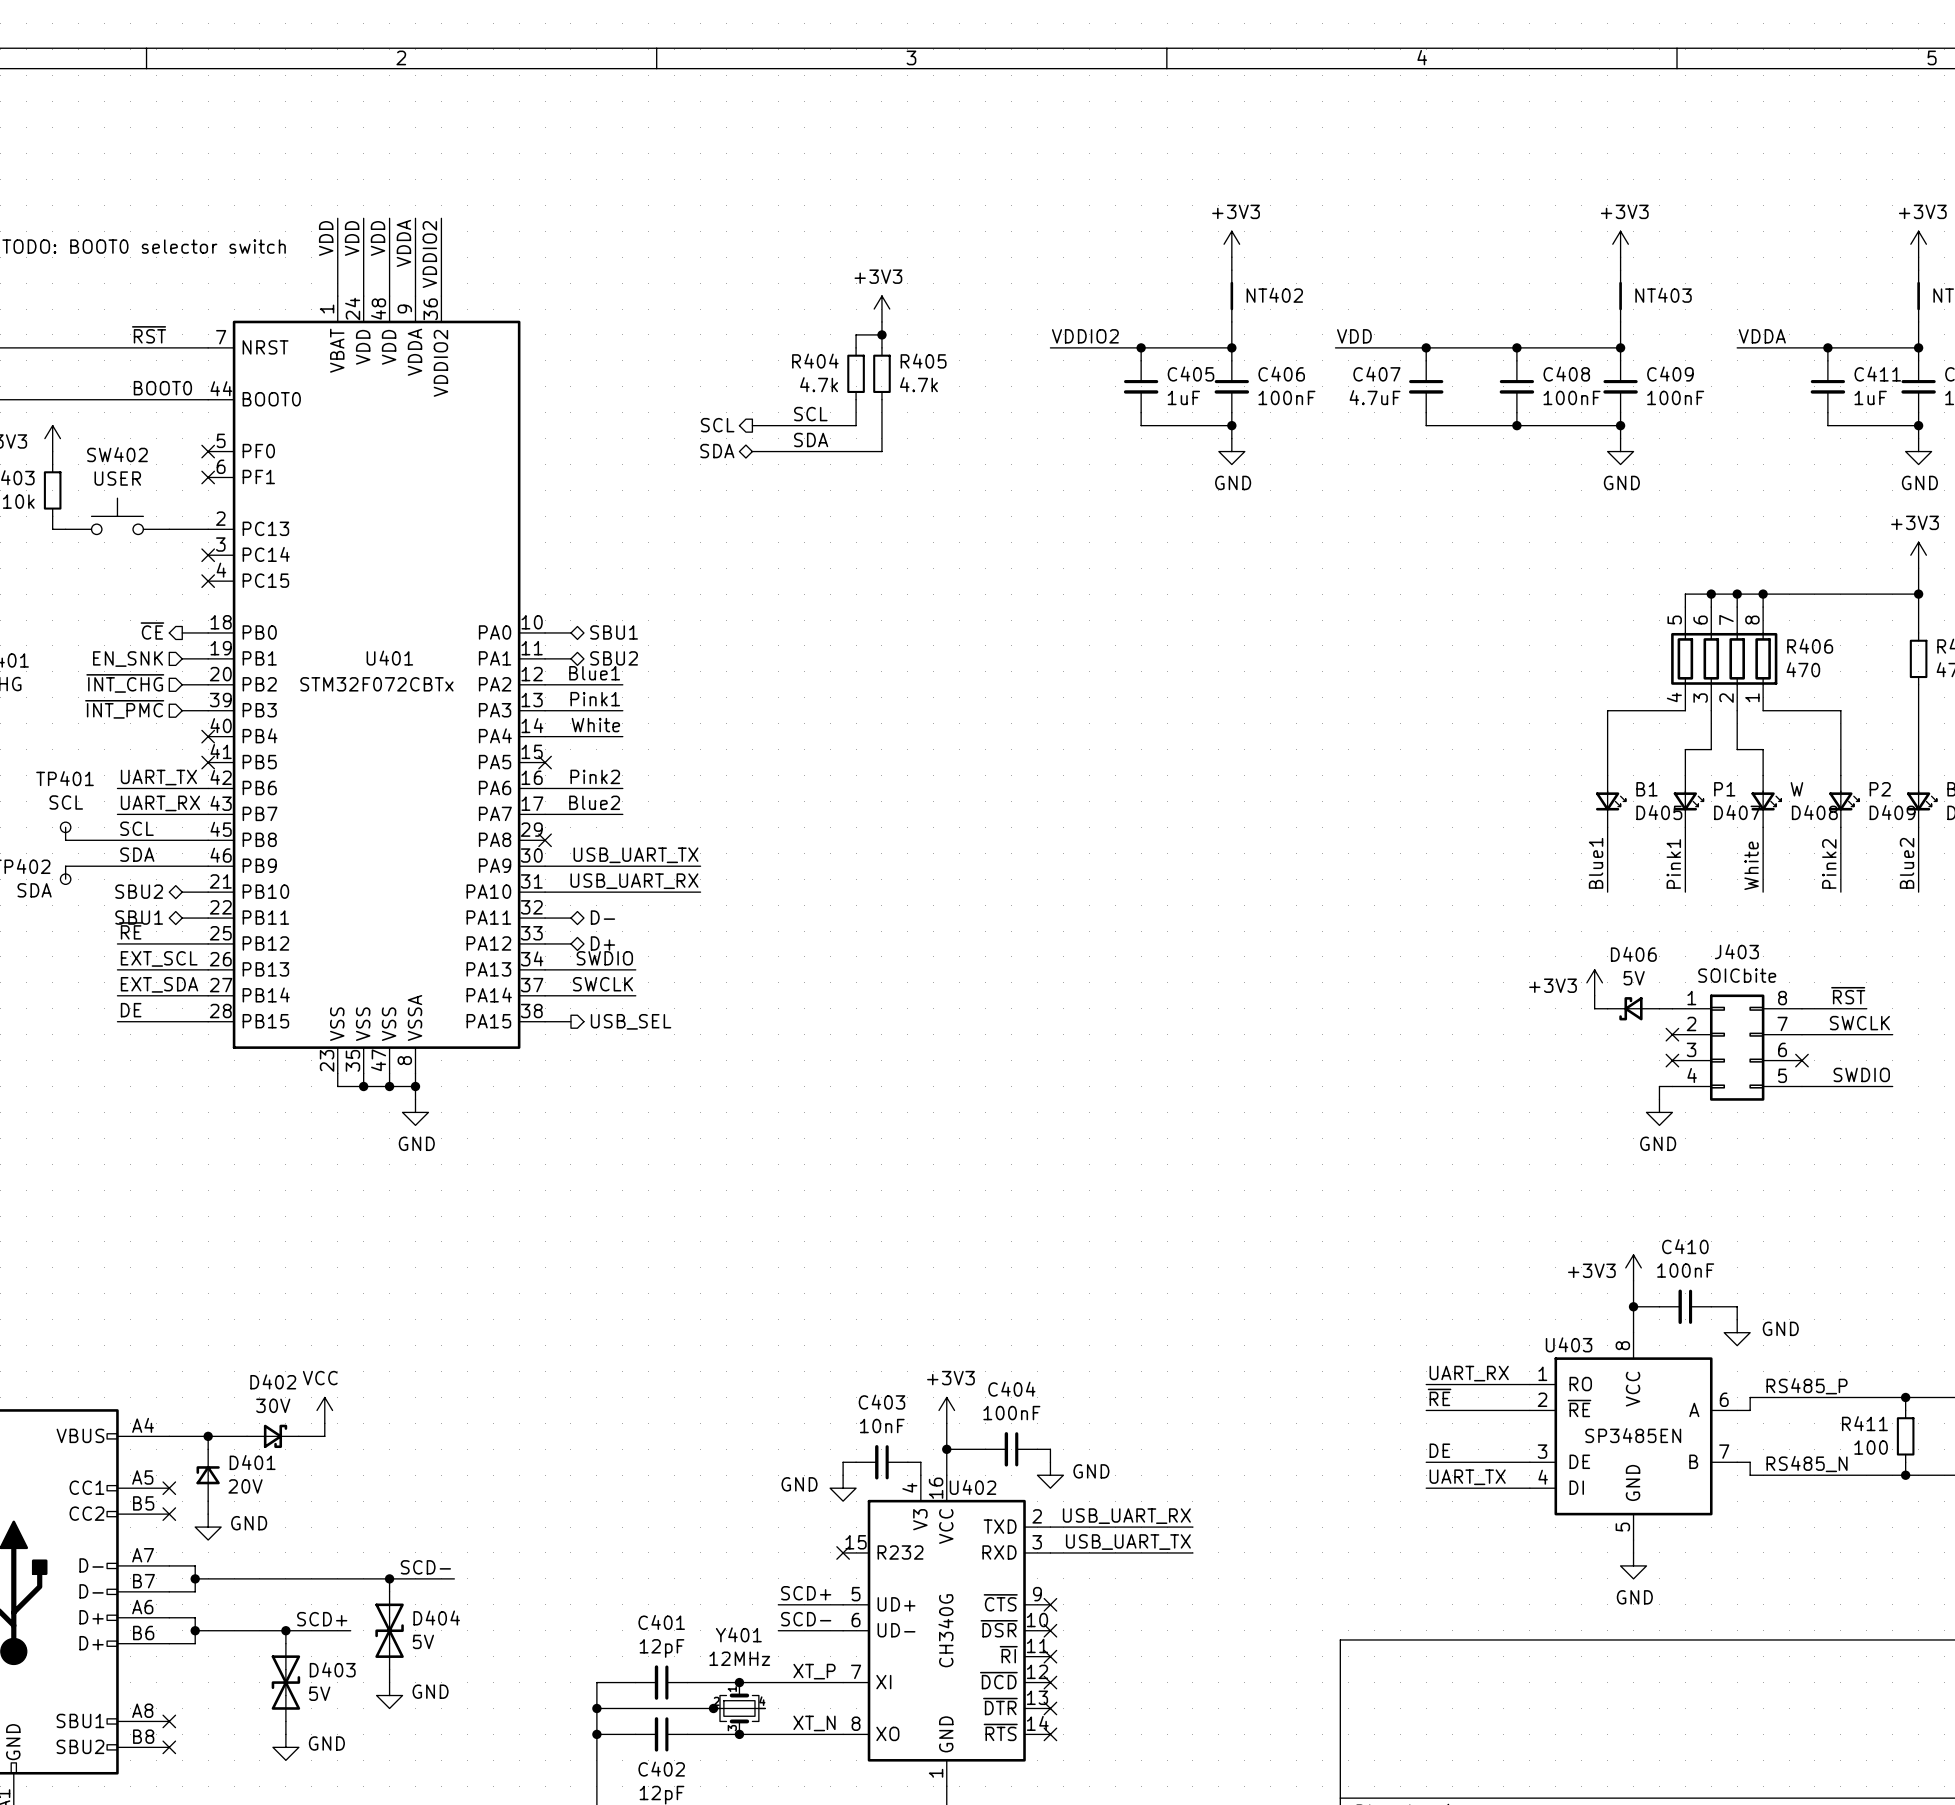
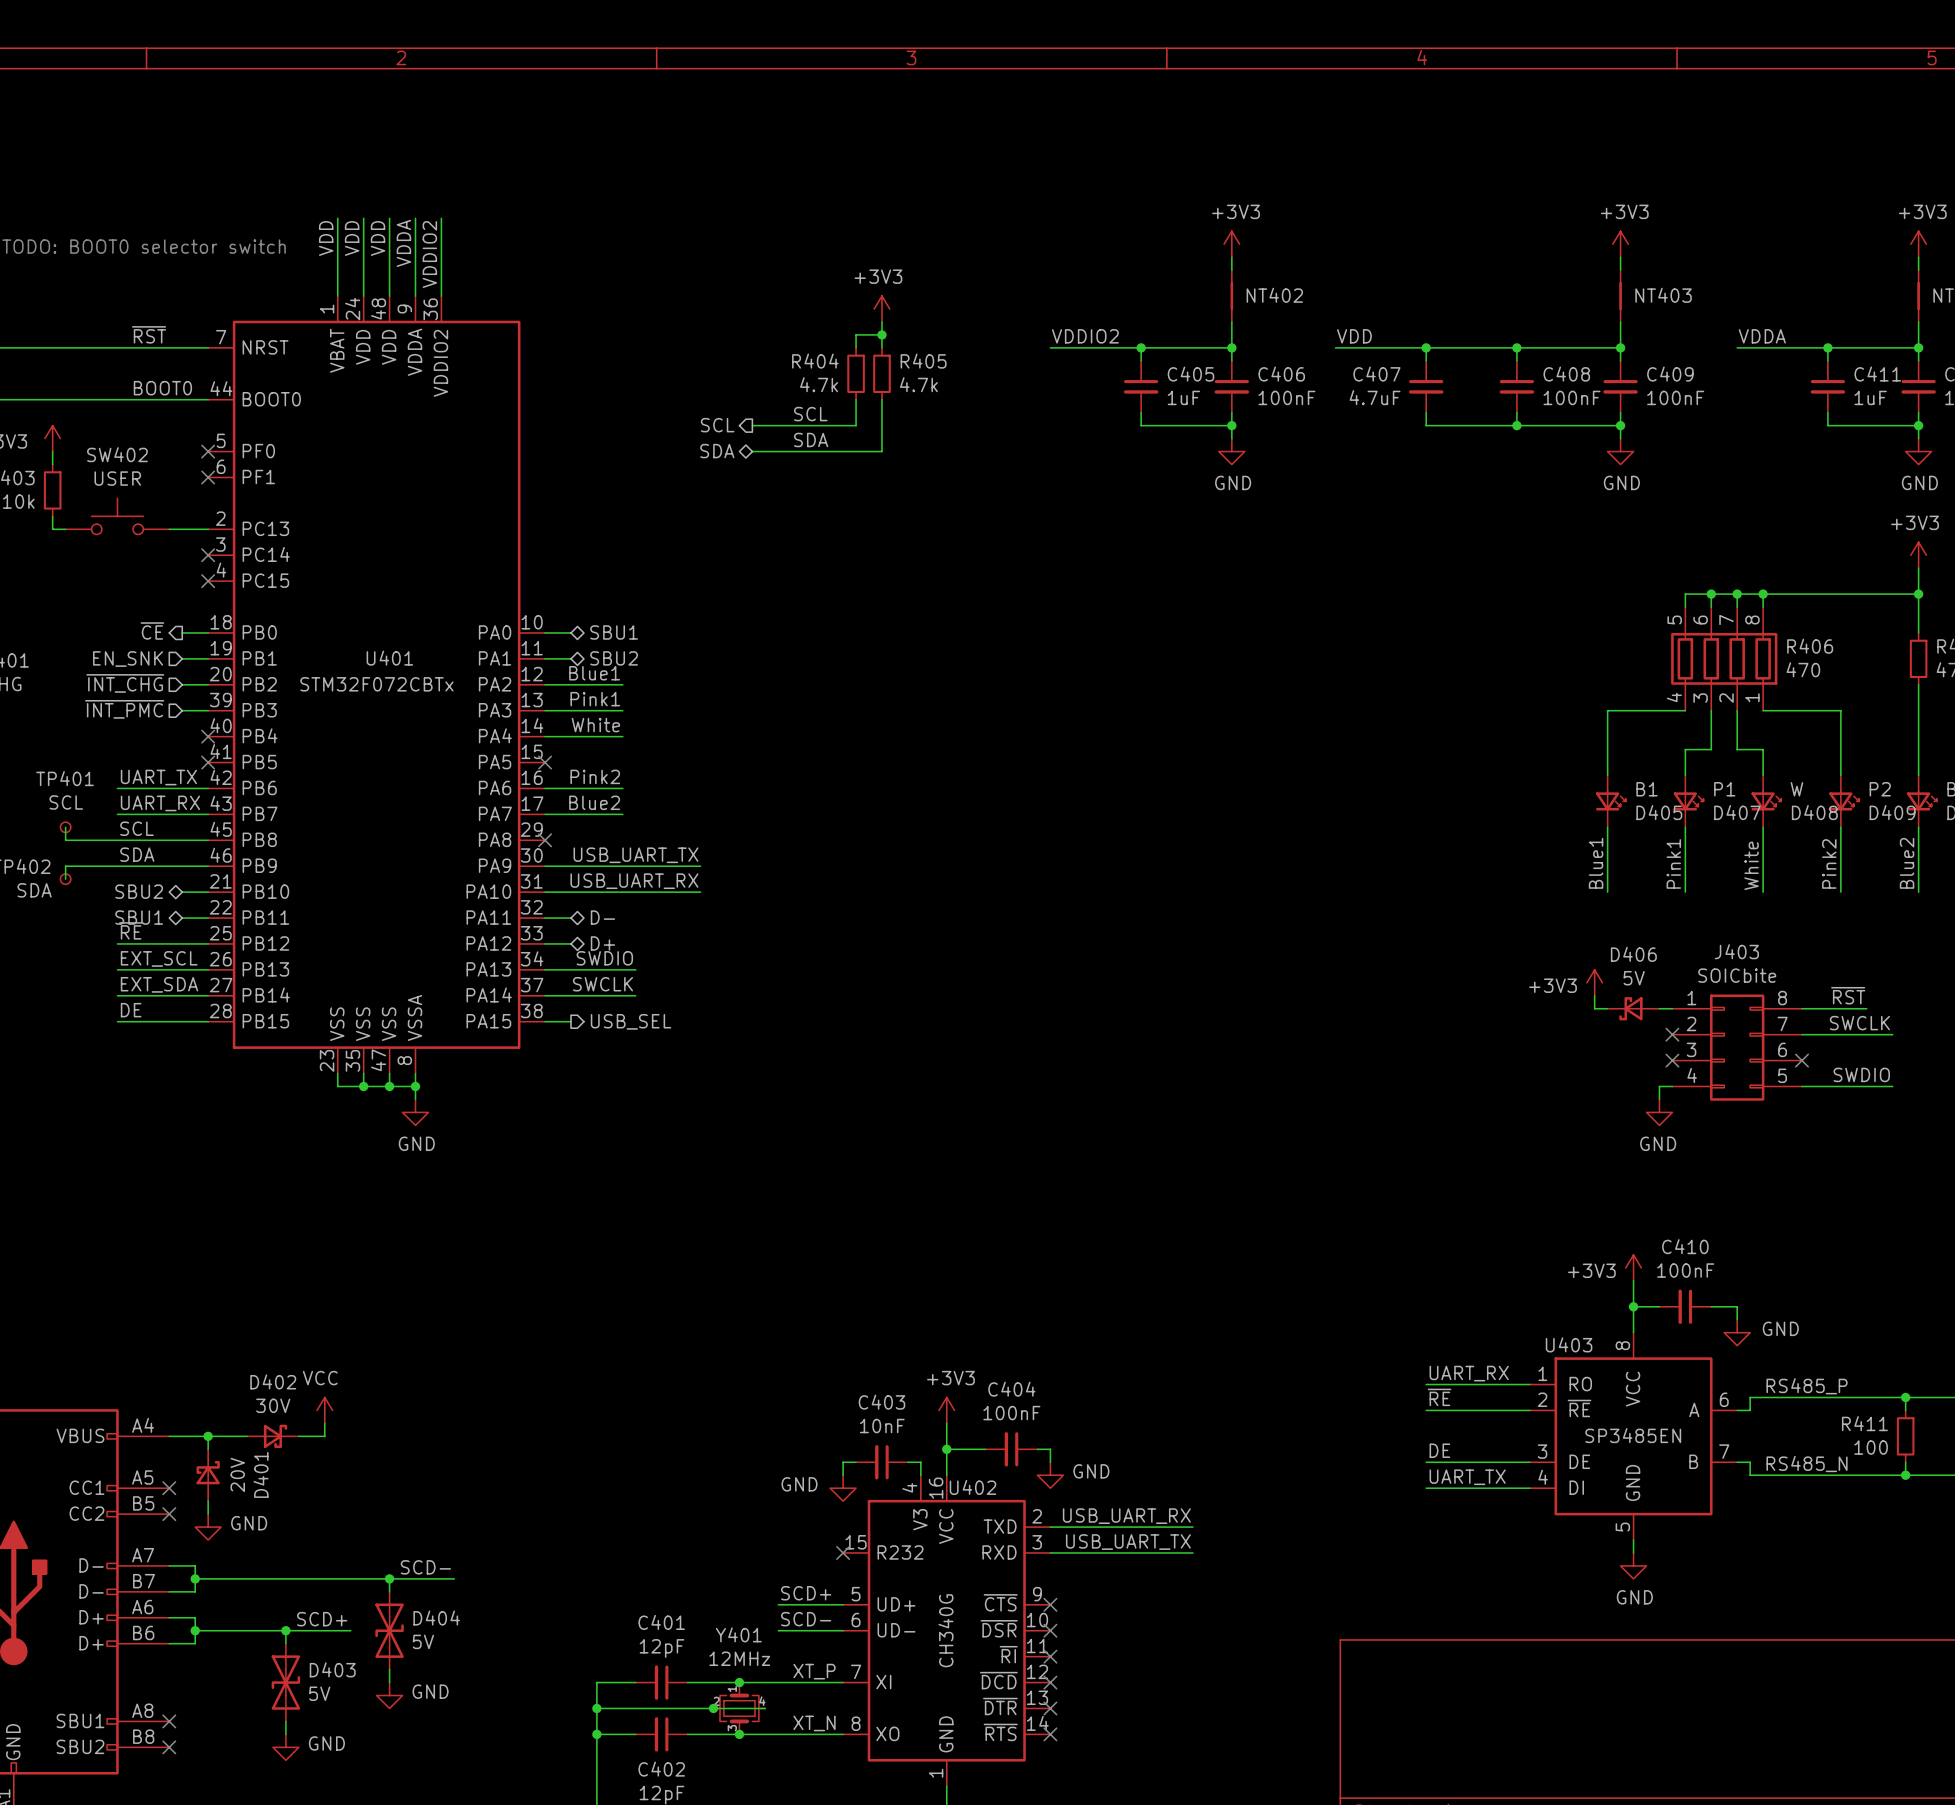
D401 symbol: [196, 1449, 220, 1502] -> [196, 1449, 220, 1502]
D401 name rotation: 0° (252, 1462) -> 90° counterclockwise (261, 1474)
D401 value rotation: 0° (245, 1486) -> 90° counterclockwise (237, 1474)

